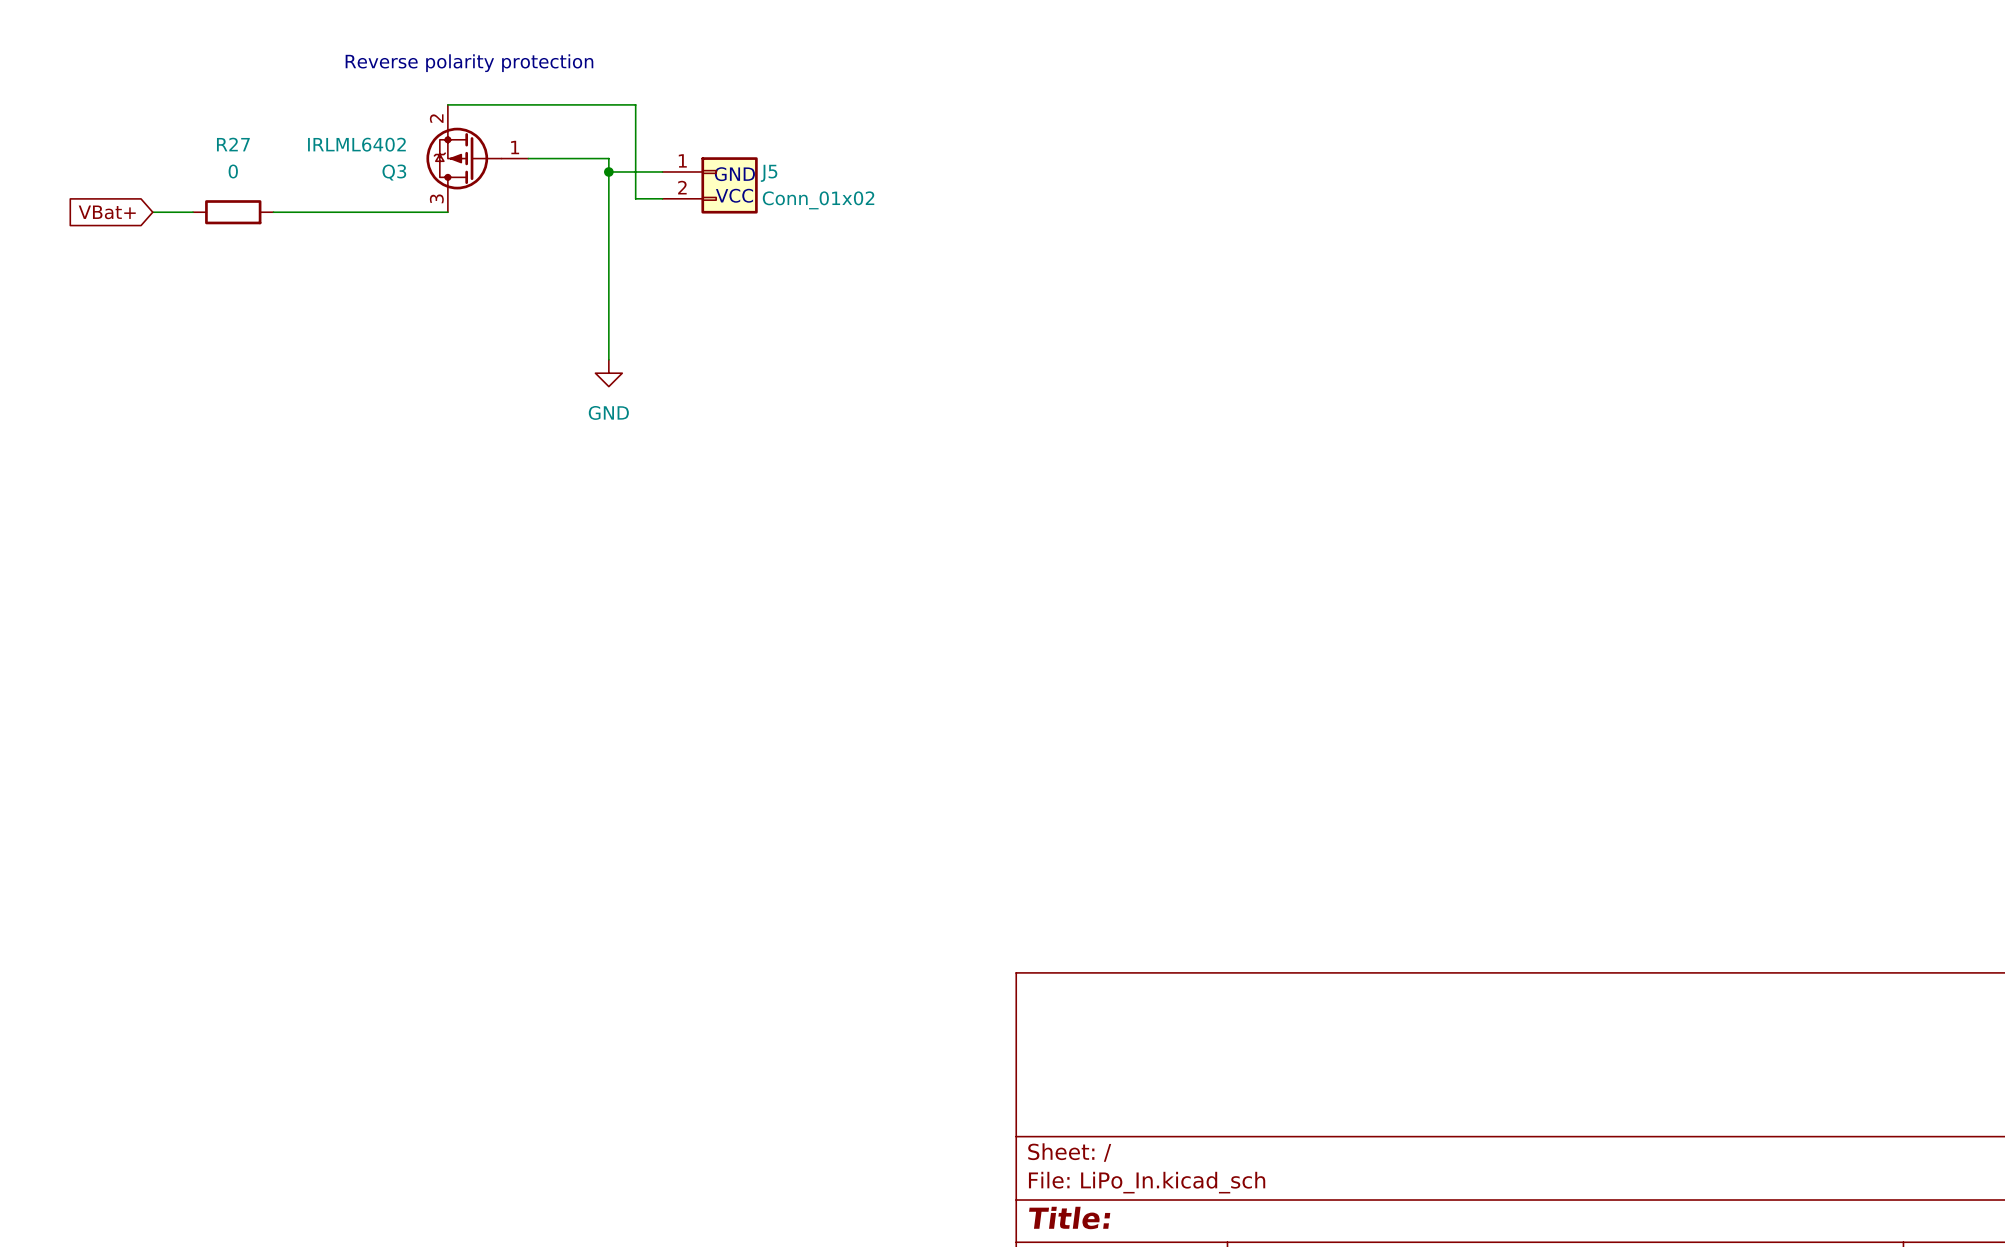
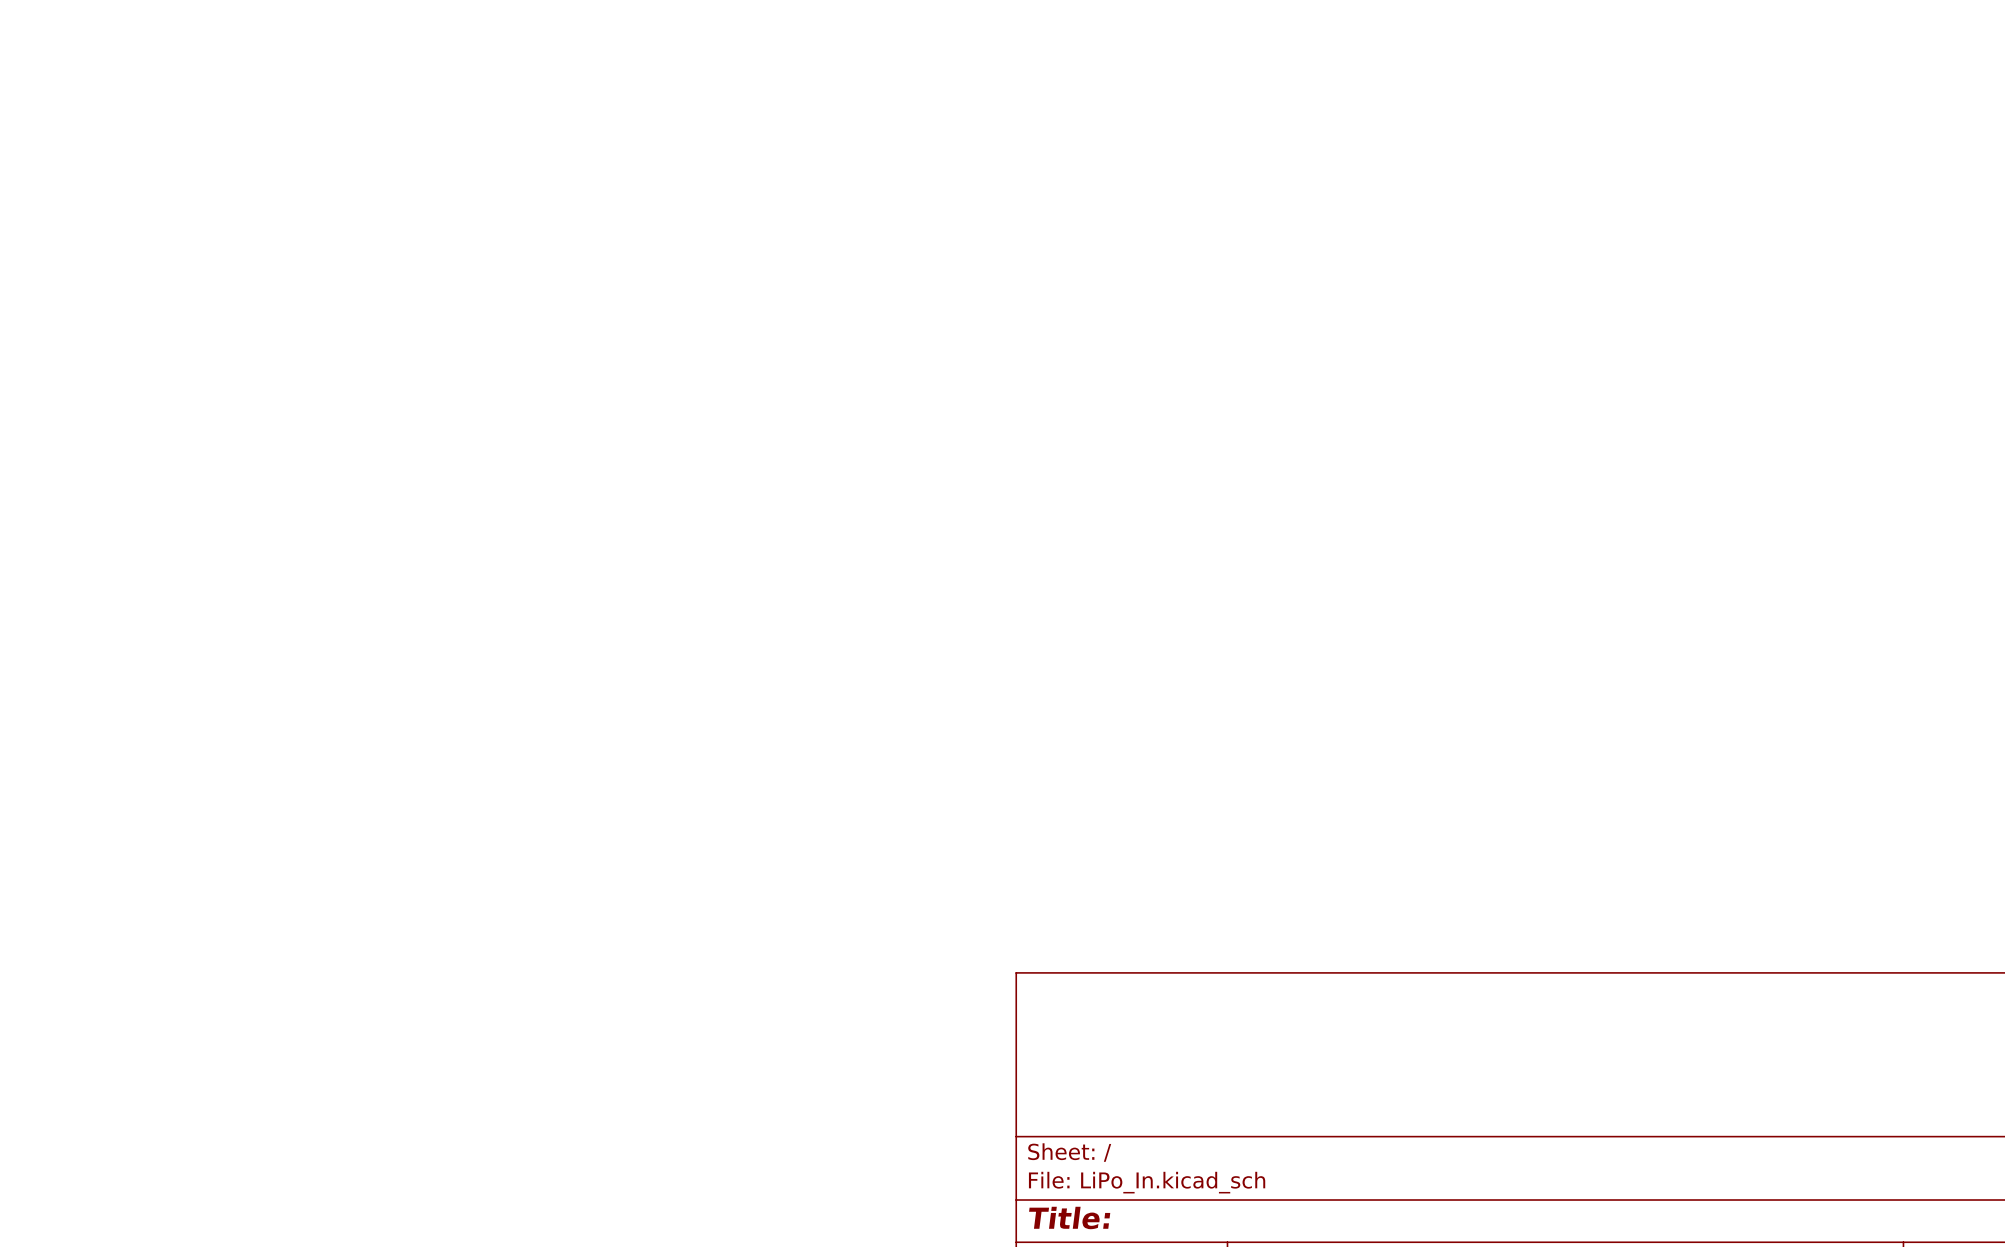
text: Reverse polarity protection (469, 63) -> none
wire: (447, 104) (635, 104) (635, 198) (662, 198) -> none
Q3: IRLML6402 (477, 158) -> none
wire: (528, 158) (608, 158) (608, 359) -> none
wire: (608, 171) (662, 171) -> none
junction: (608, 171) -> none
text: GND (734, 174) -> none
J5: Conn_01x02 (710, 185) -> none
text: VCC (734, 195) -> none
global label: VBat+ (107, 212) -> none
wire: (152, 212) (193, 212) -> none
R27: 0 (233, 212) -> none
wire: (273, 212) (447, 212) -> none
power symbol: GND (608, 373) -> none

